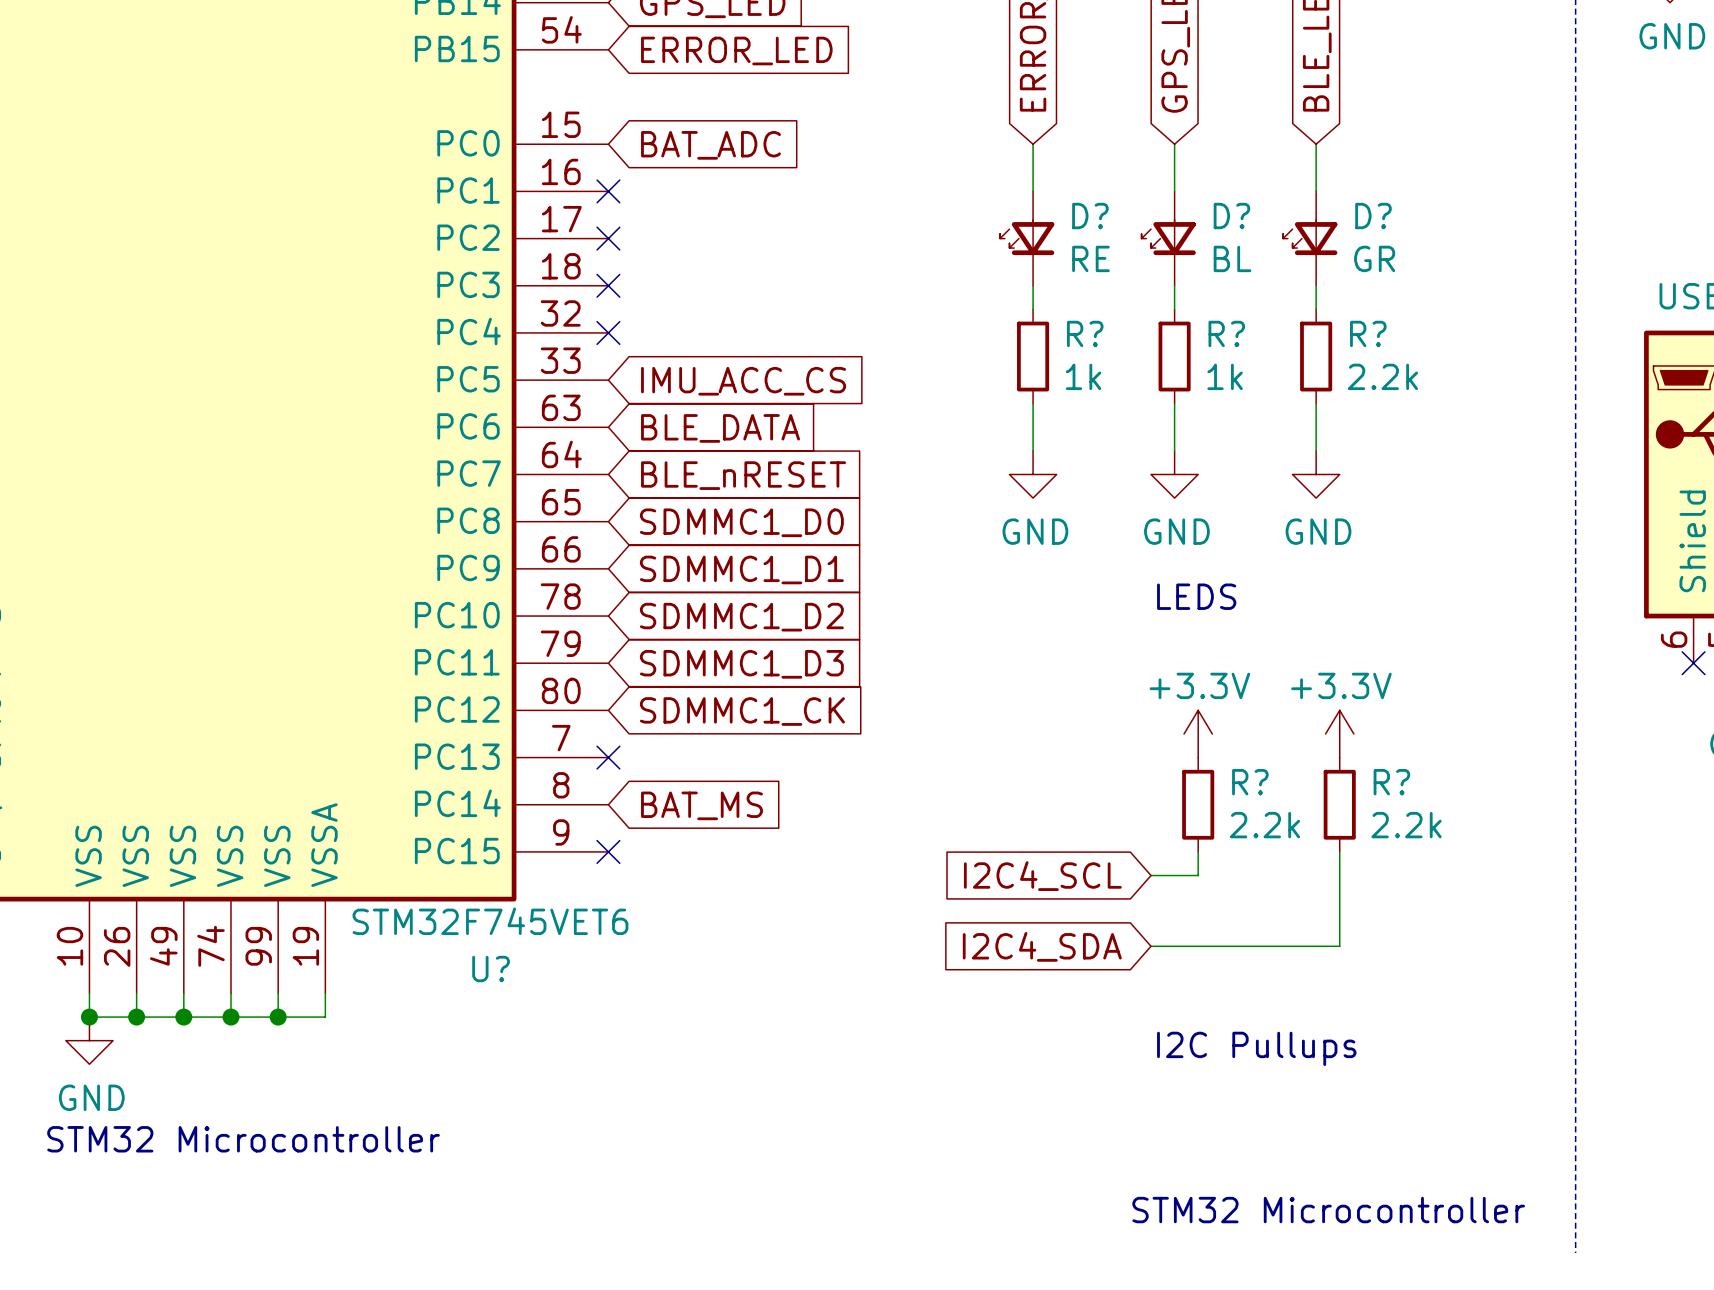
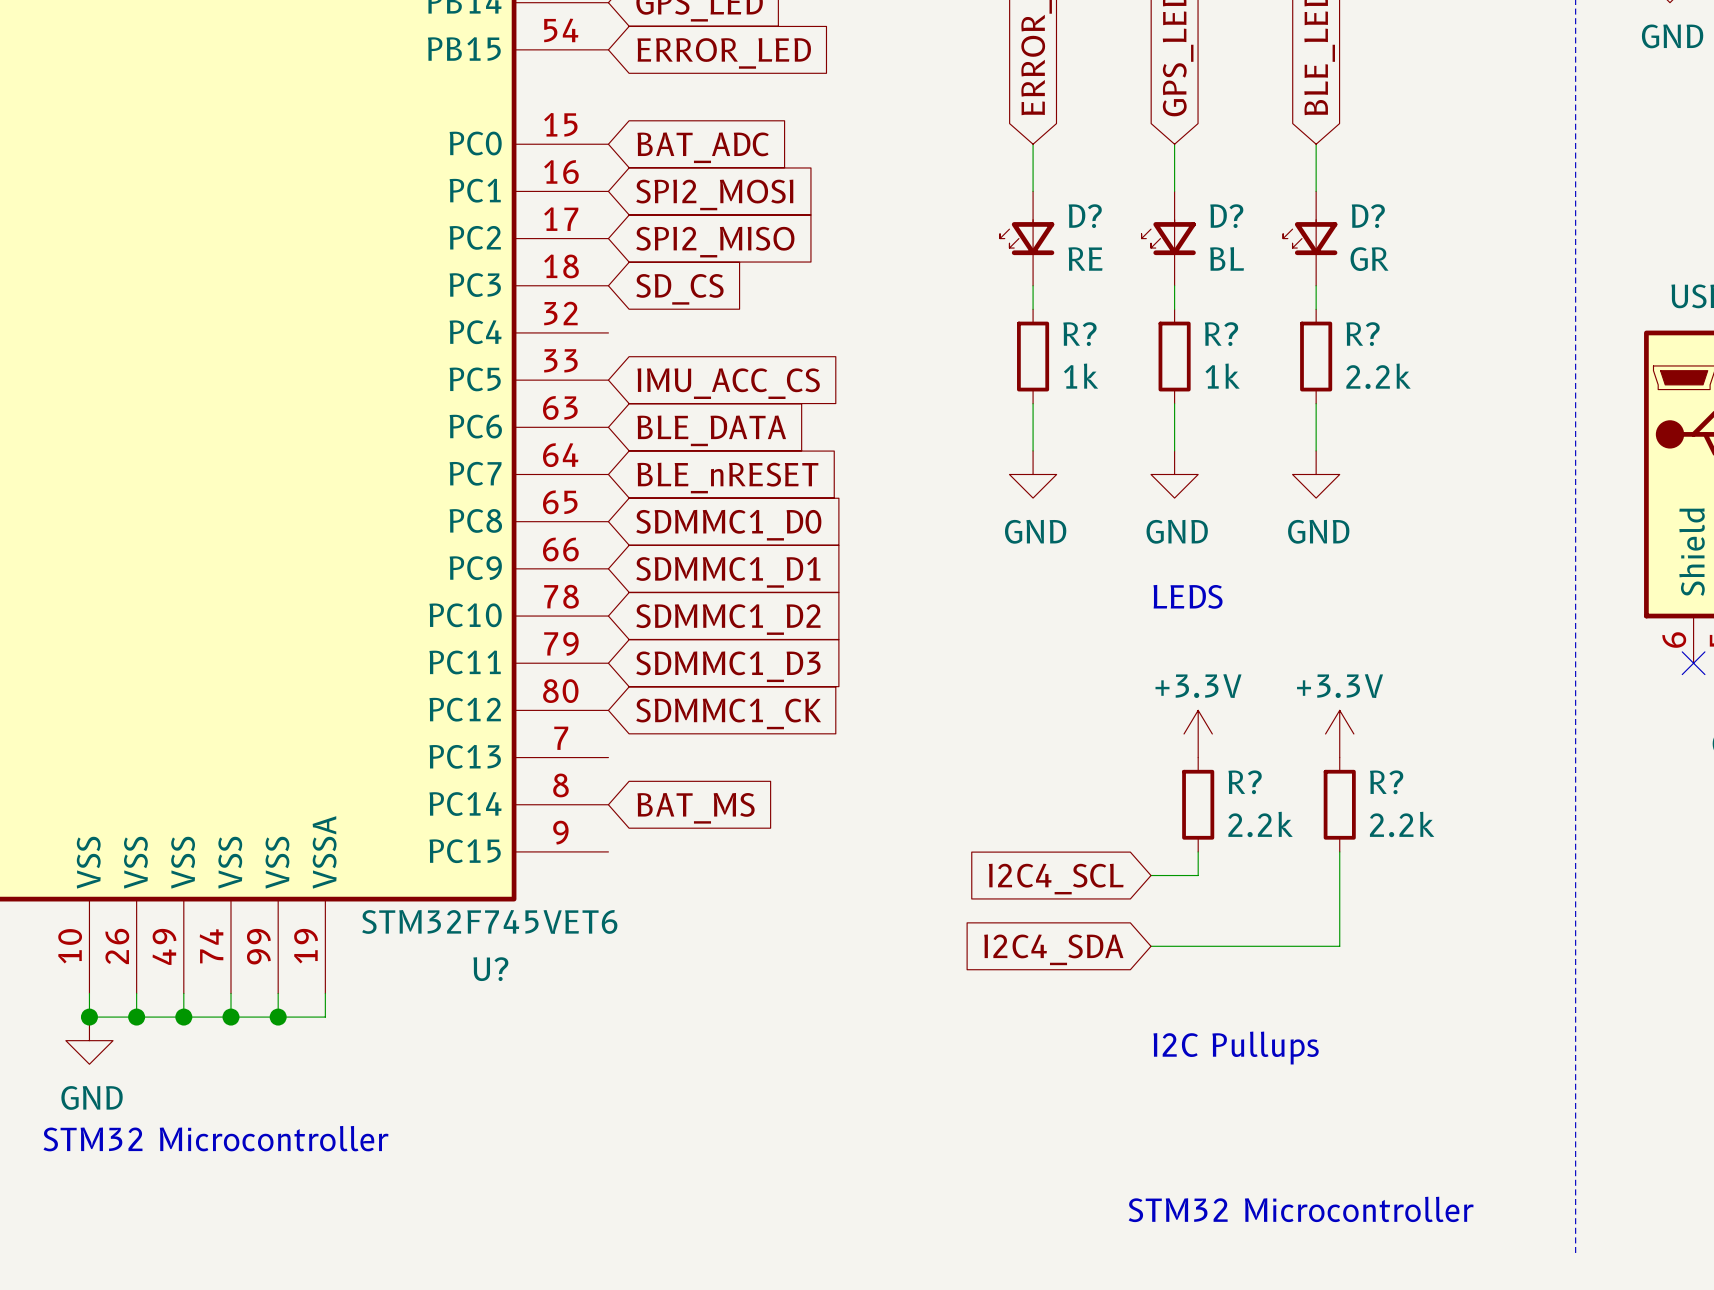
no-connect mark: (608, 191) -> none
global label: none -> SPI2_MOSI (714, 194)
no-connect mark: (608, 238) -> none
global label: none -> SPI2_MISO (715, 242)
no-connect mark: (608, 285) -> none
global label: none -> SD_CS (679, 289)
no-connect mark: (608, 332) -> none
no-connect mark: (608, 757) -> none
no-connect mark: (608, 851) -> none

